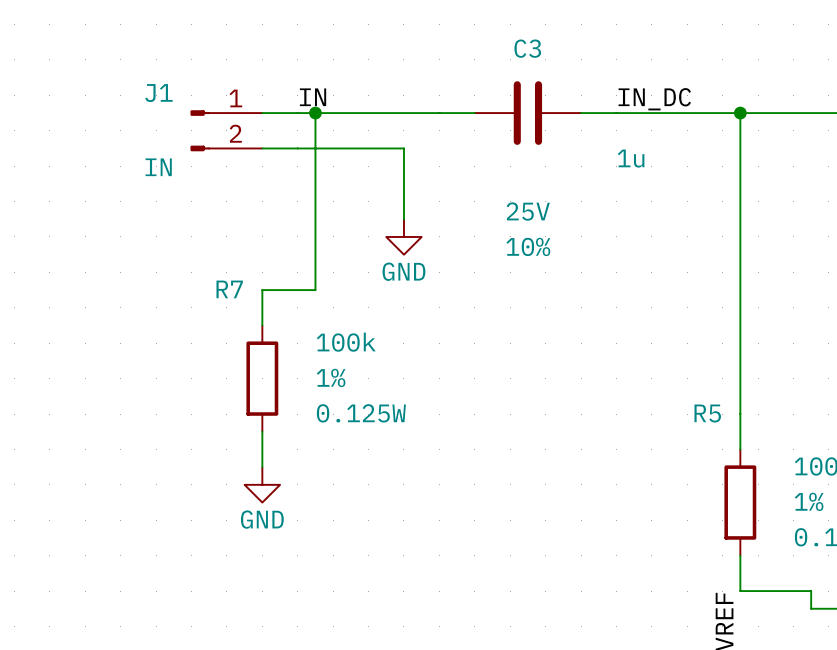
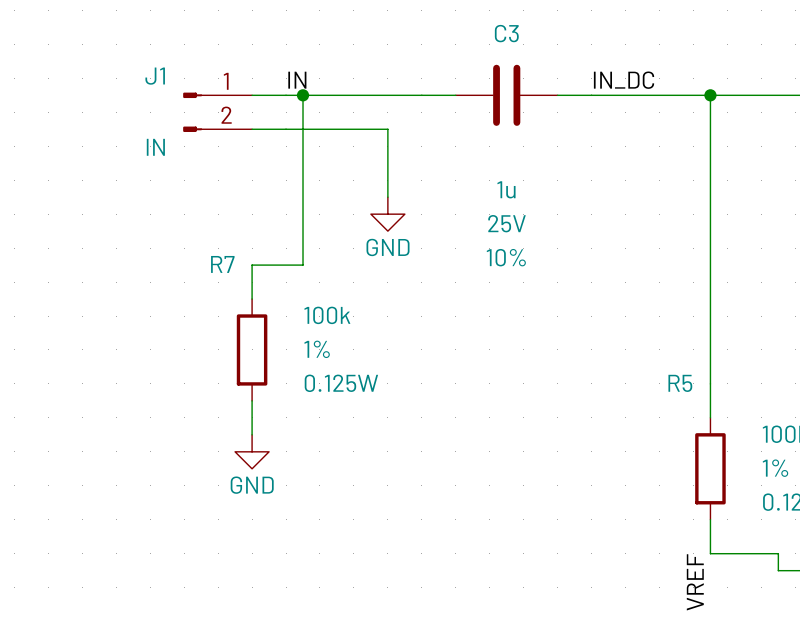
C3 value position: 1u (631, 158) -> 1u (506, 189)
C3 text position: 25V (528, 211) -> 25V (507, 223)
C3 text position: 10% (528, 246) -> 10% (506, 257)

